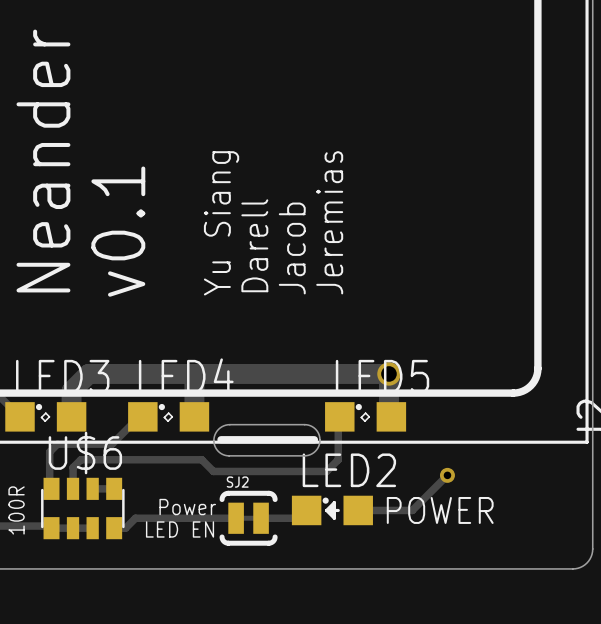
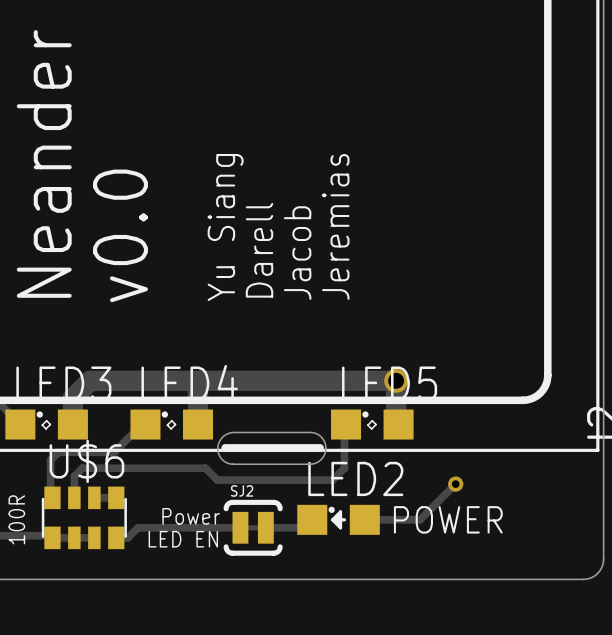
text: v0.1 (118, 231) -> v0.0 (120, 235)

